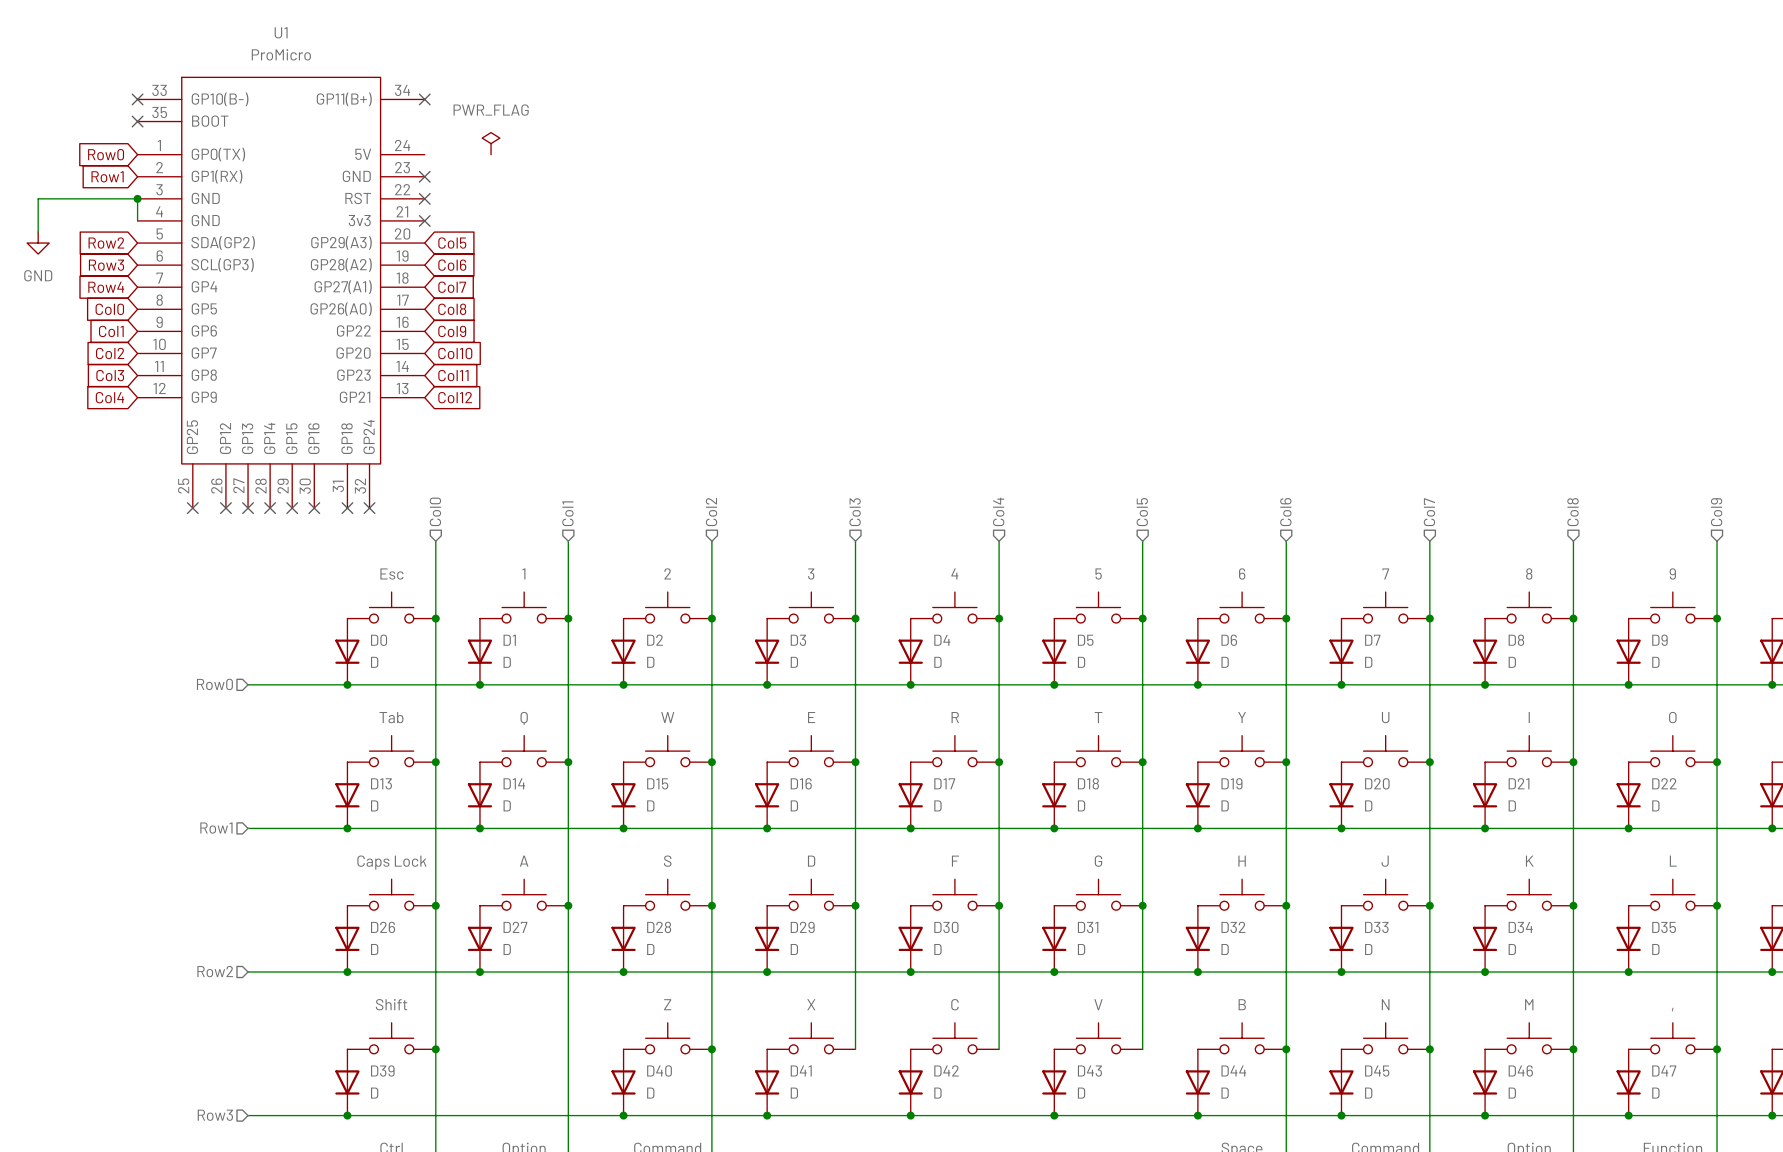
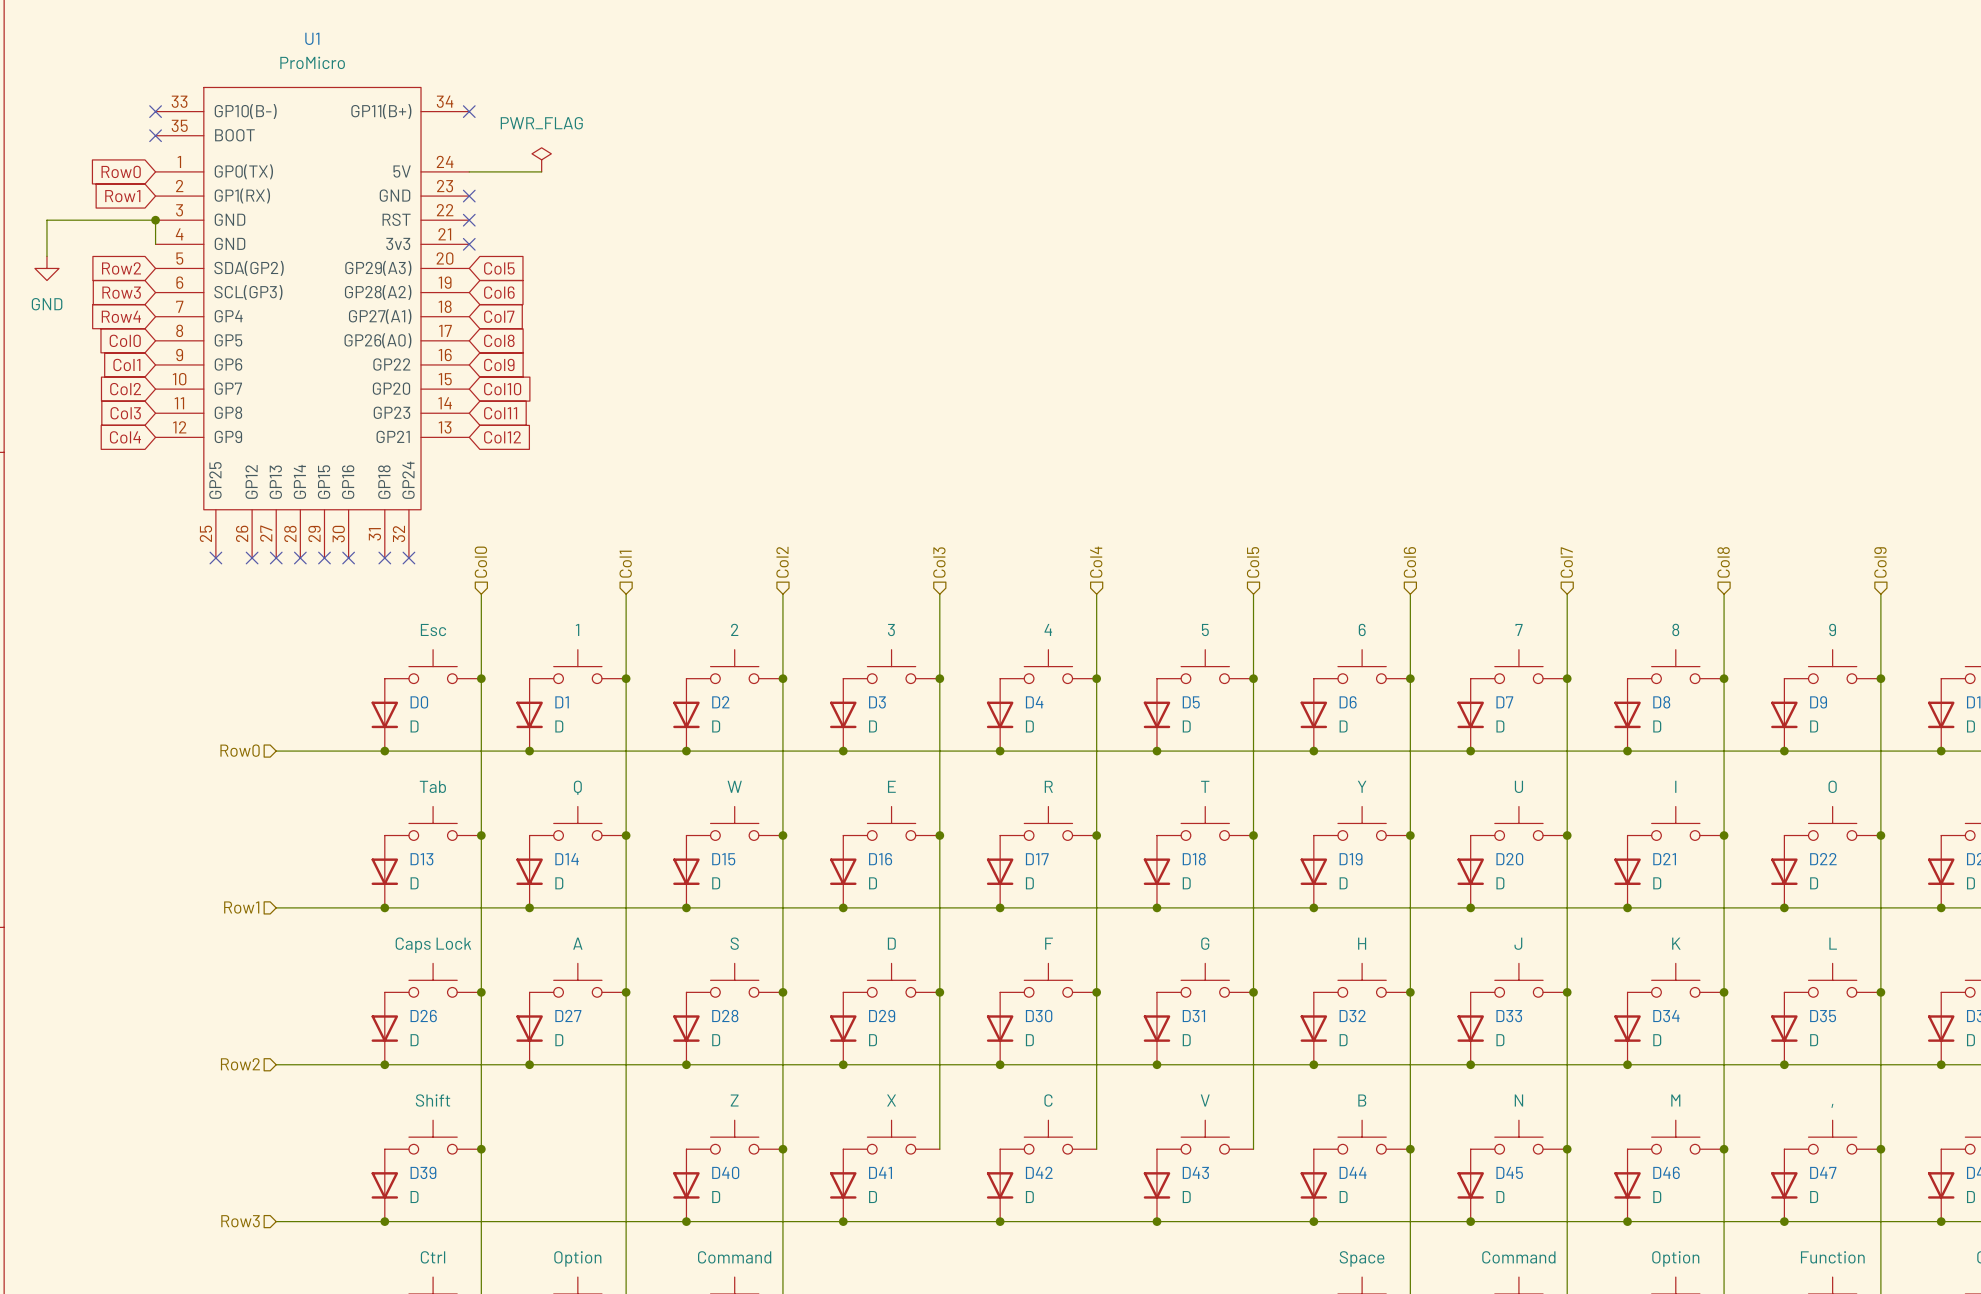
wire: none -> (469, 171) (541, 171)

